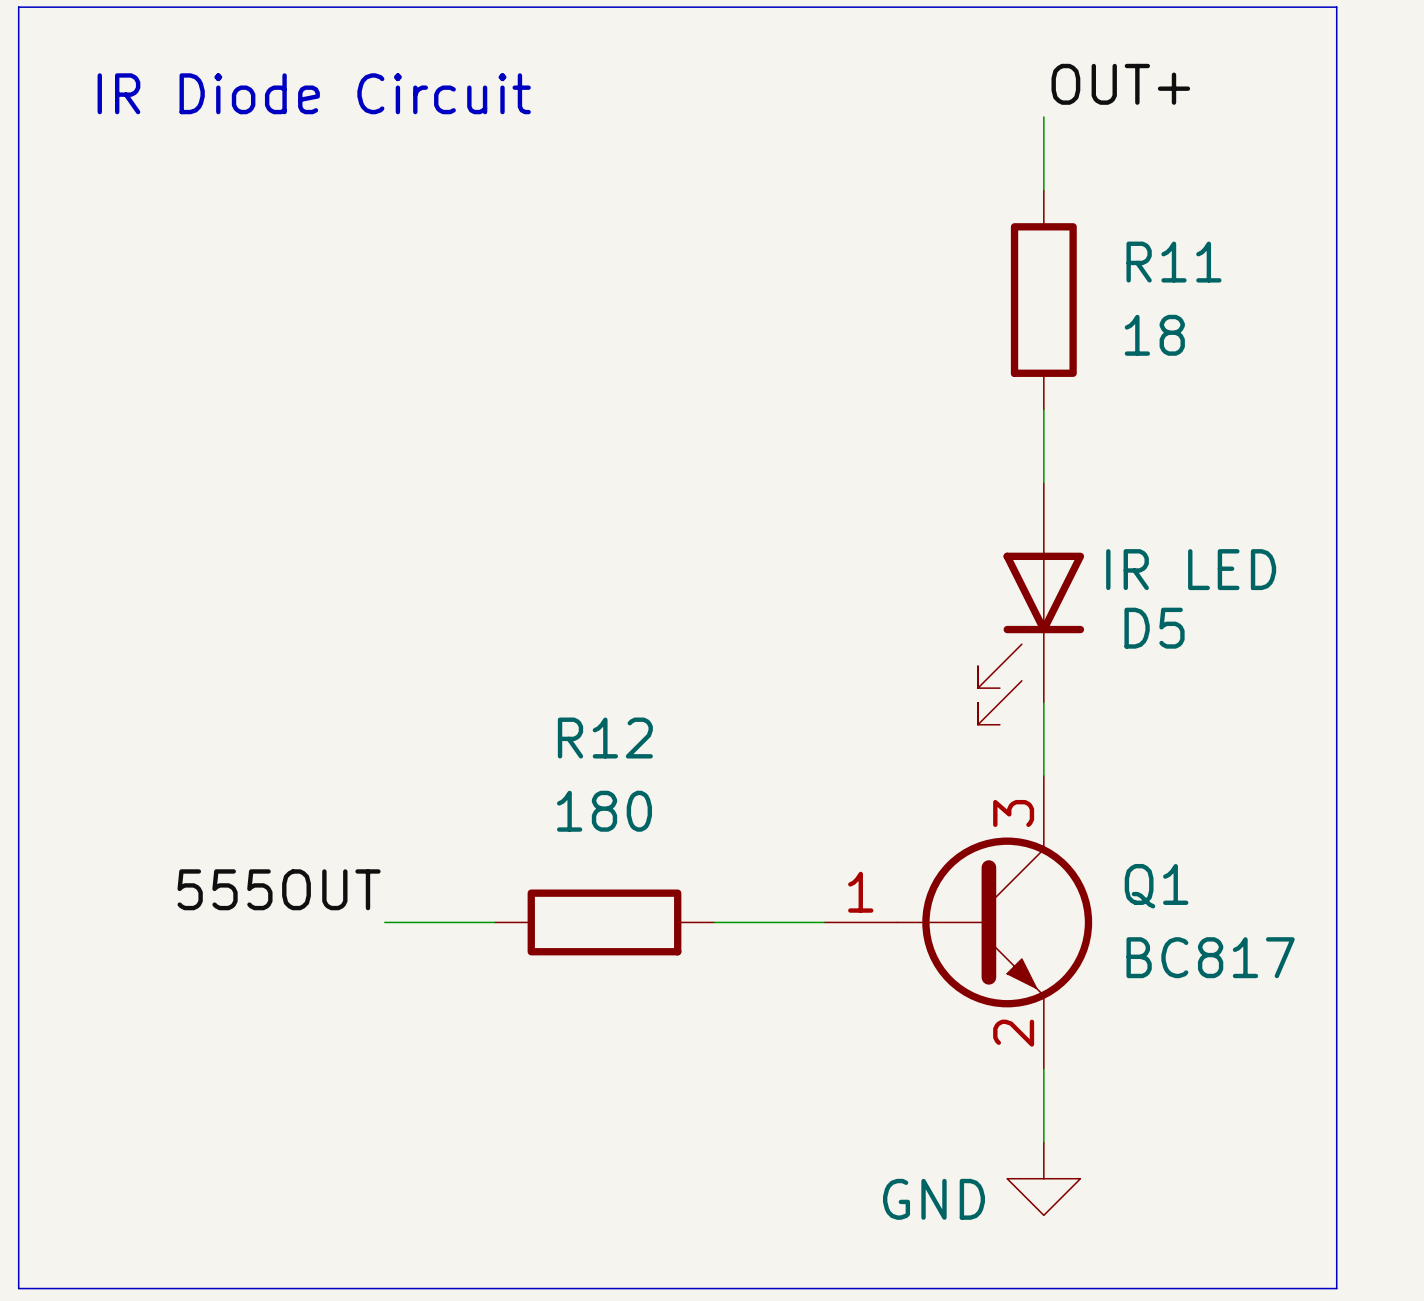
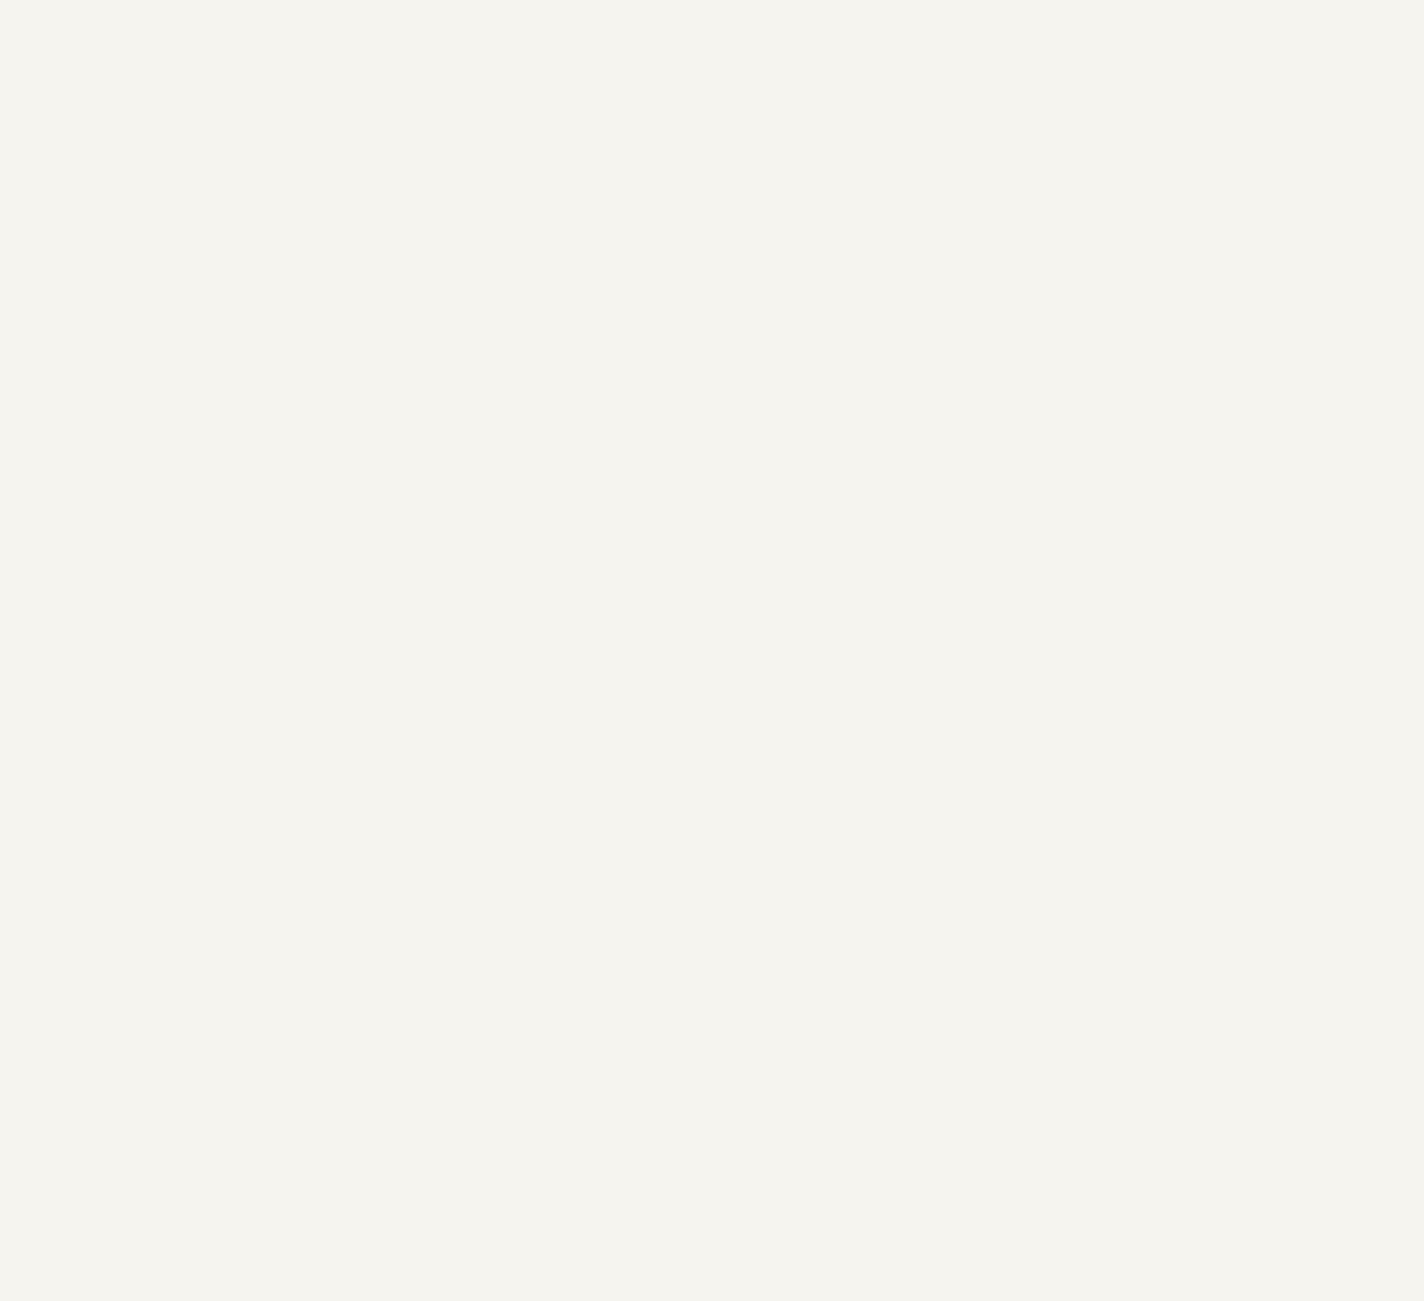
line: (18, 7) (1336, 7) (1336, 1288) (18, 1288) (18, 7) -> none
label: OUT+ (1120, 84) -> none
text: IR Diode Circuit (314, 93) -> none
wire: (1043, 116) (1043, 190) -> none
R11: 18 (1043, 300) -> none
wire: (1043, 409) (1043, 483) -> none
D5: IR LED (1031, 603) -> none
wire: (1043, 702) (1043, 776) -> none
label: 555OUT (279, 889) -> none
wire: (384, 922) (494, 922) -> none
R12: 180 (604, 922) -> none
wire: (714, 922) (824, 922) -> none
Q1: BC817 (958, 922) -> none
wire: (1043, 1068) (1043, 1142) -> none
power symbol: GND (1043, 1178) -> none

